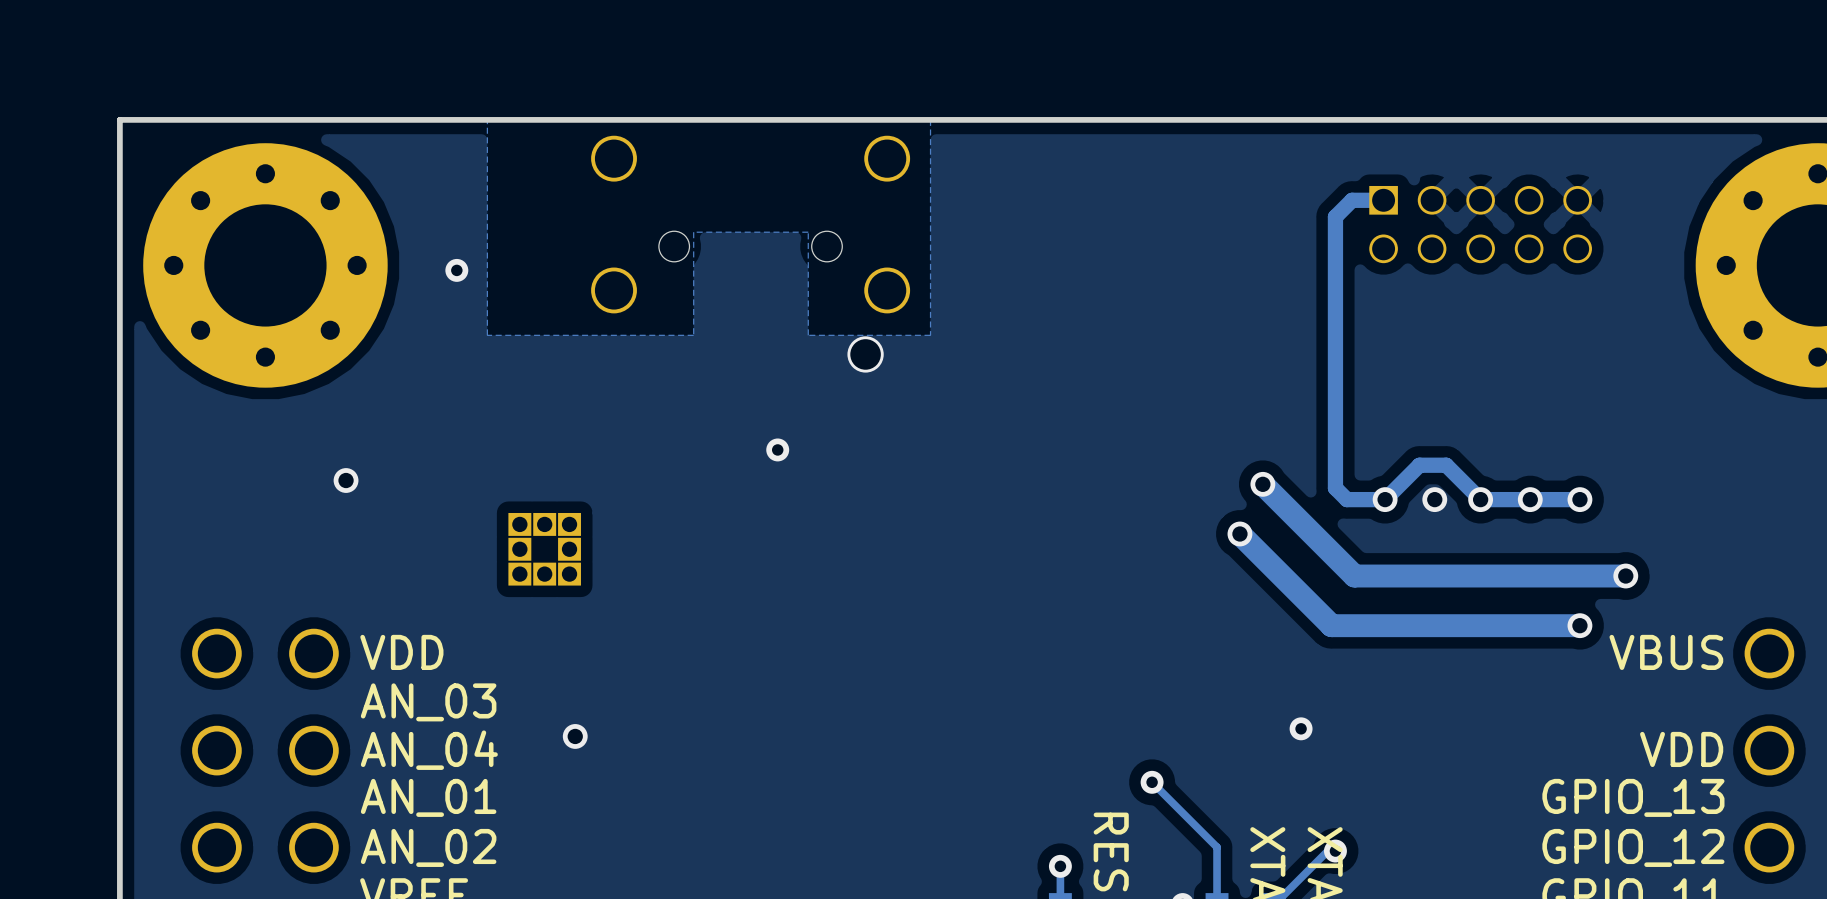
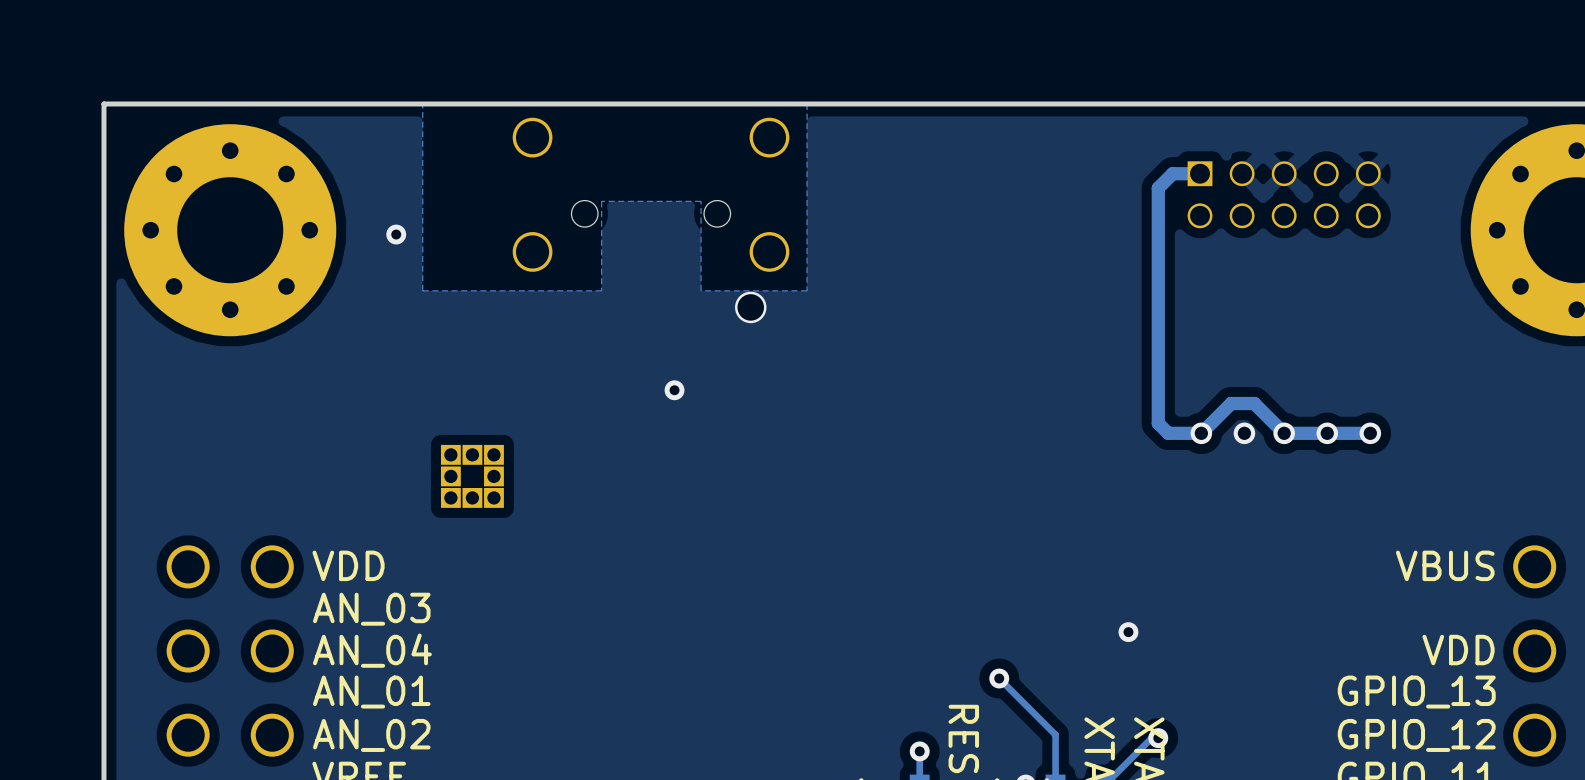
via: (346, 480) -> none
track: (1262, 484) (1354, 576) (1625, 576) -> none
via: (1262, 484) -> none
track: (1239, 533) (1331, 625) (1579, 625) -> none
via: (1239, 533) -> none
via: (1625, 576) -> none
via: (1579, 625) -> none
via: (575, 736) -> none

